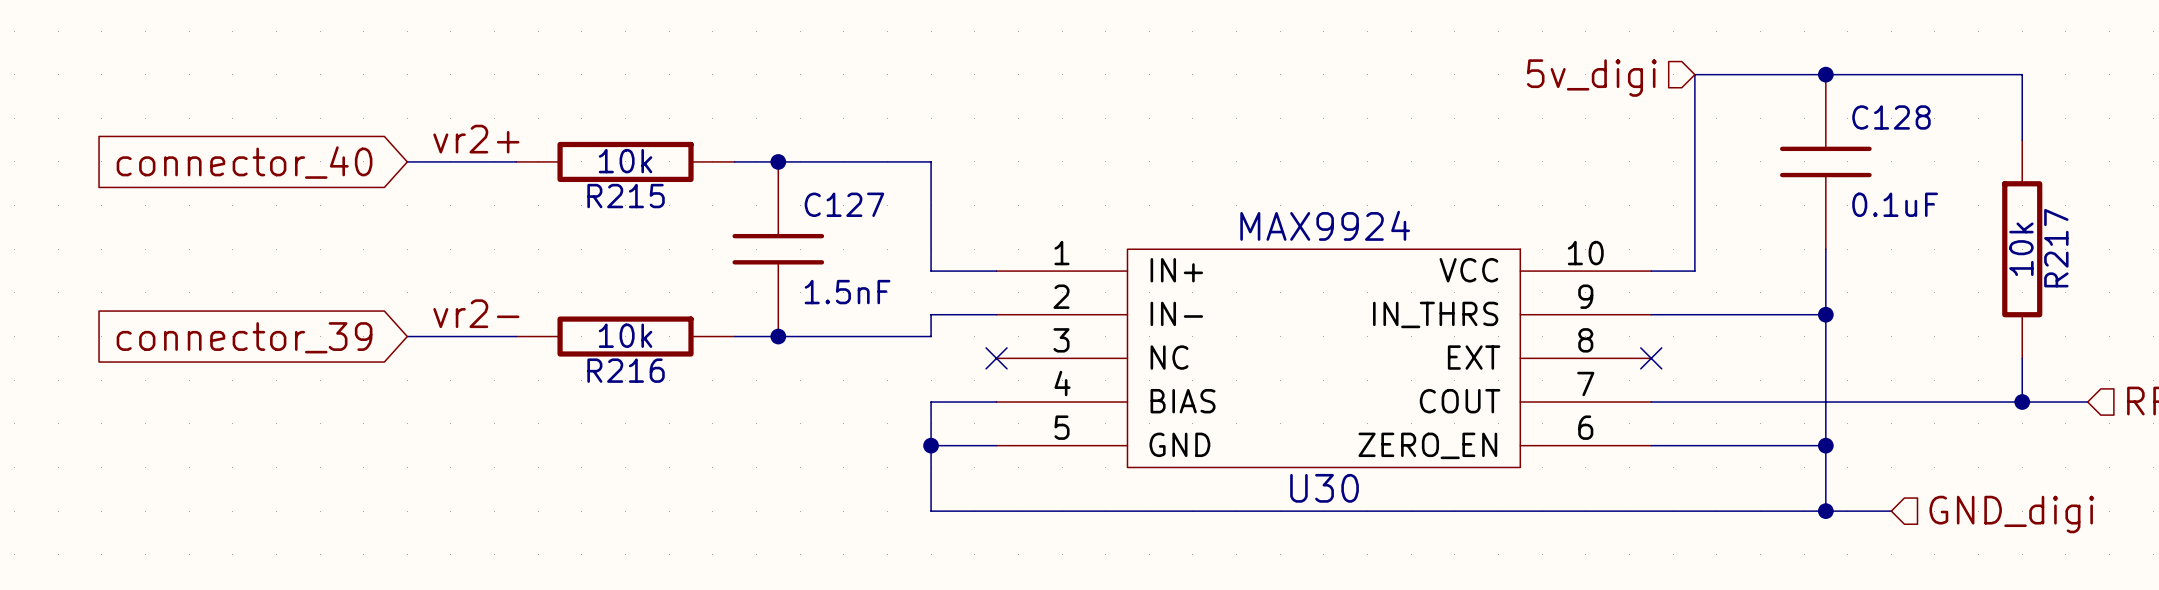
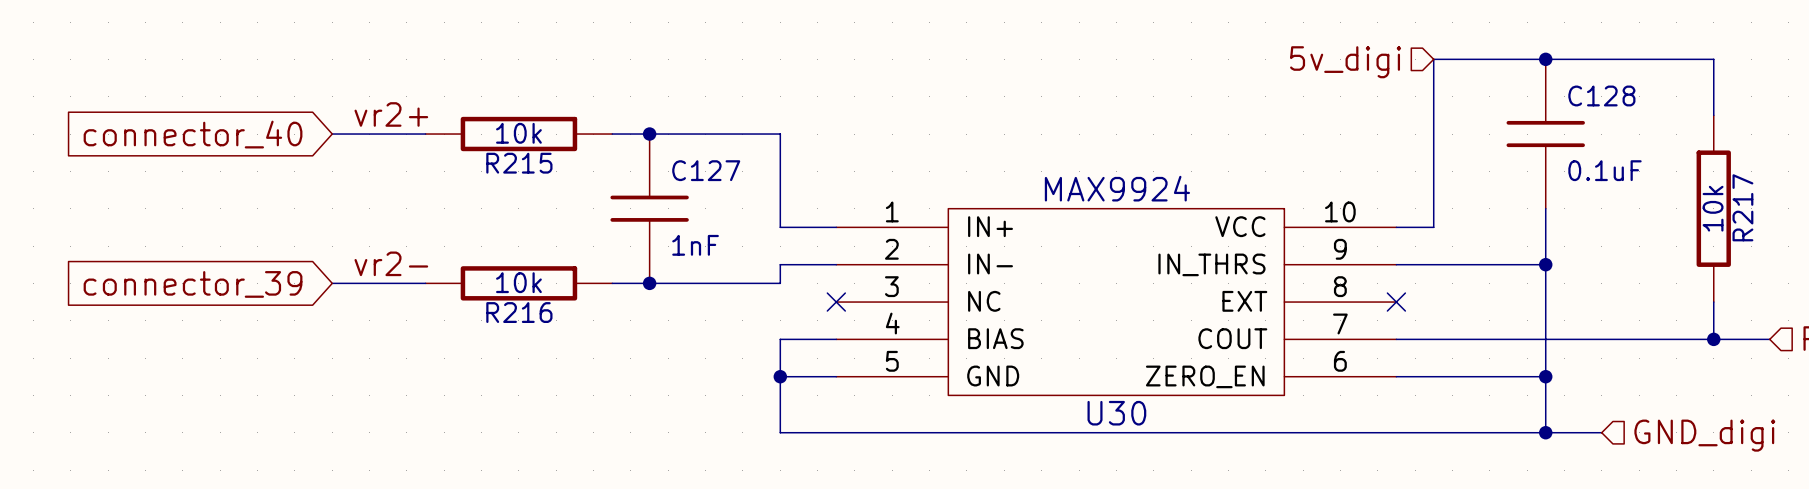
C127 value: 1.5nF (847, 292) -> 1nF (695, 245)

